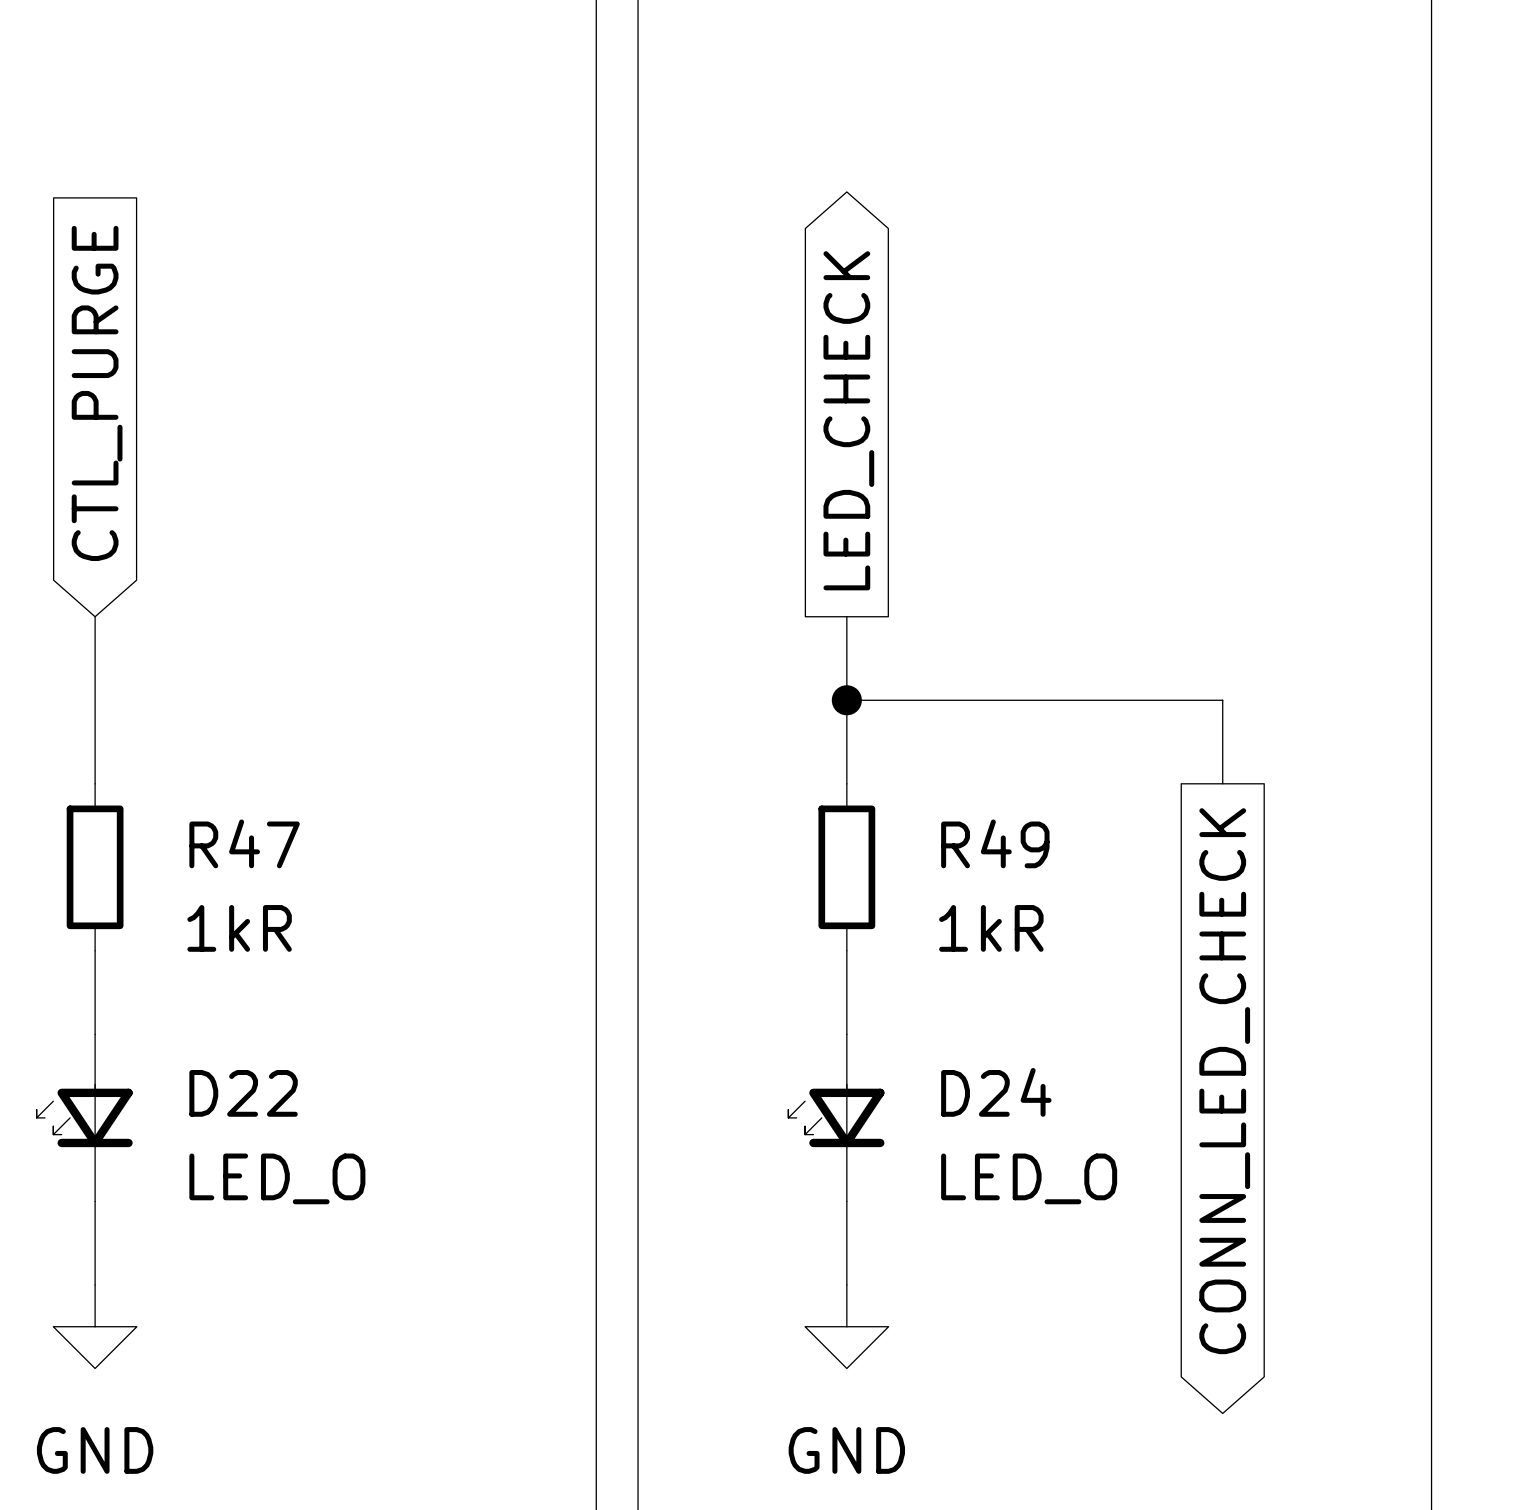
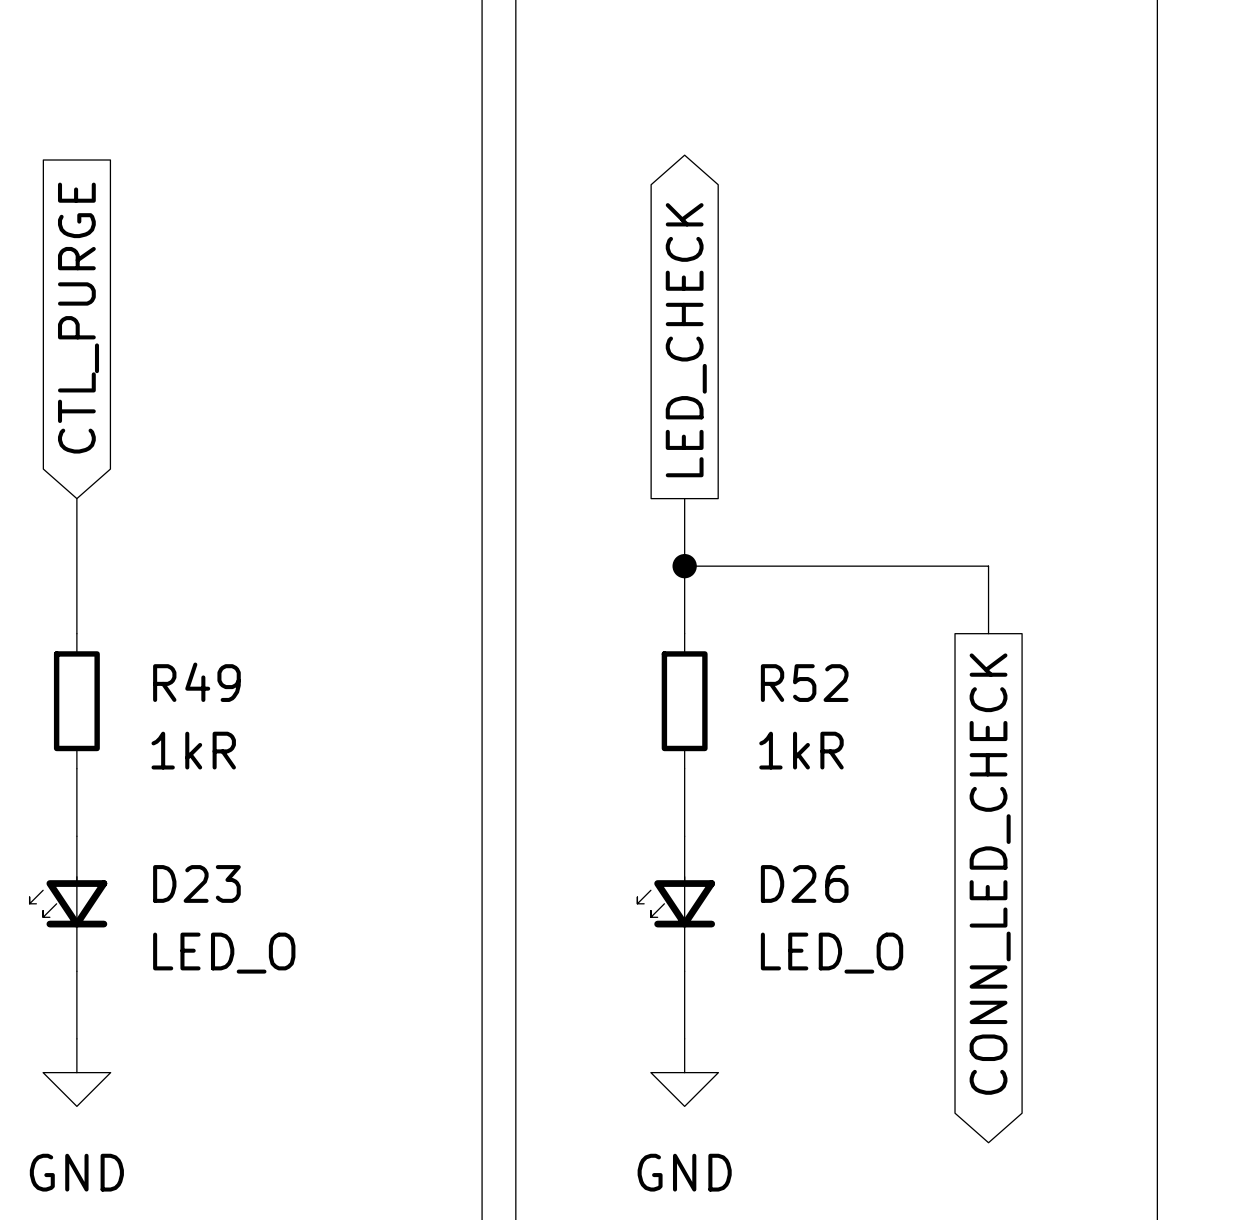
R47 name: R47 (244, 843) -> R49 (196, 682)
R49 name: R49 (995, 843) -> R52 (804, 683)
D24 name: D24 (996, 1092) -> D26 (804, 883)
D22 name: D22 (243, 1093) -> D23 (196, 883)

